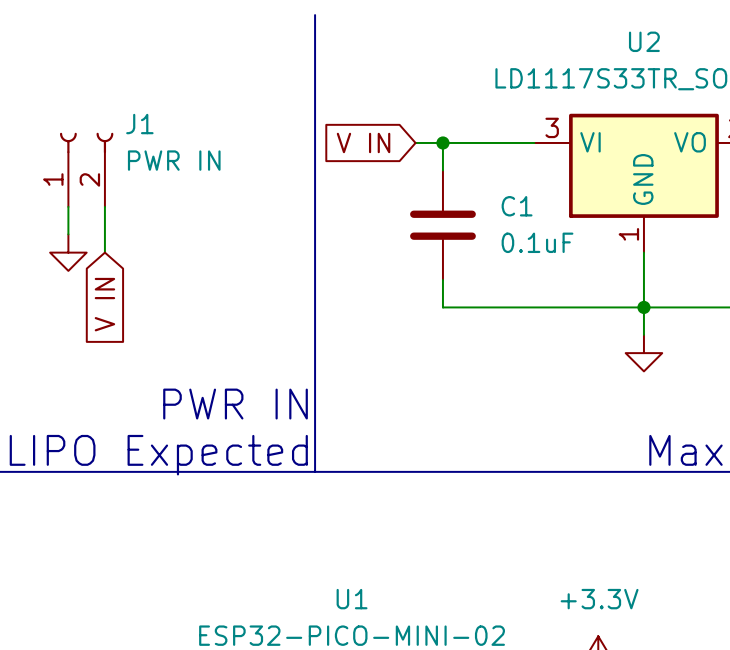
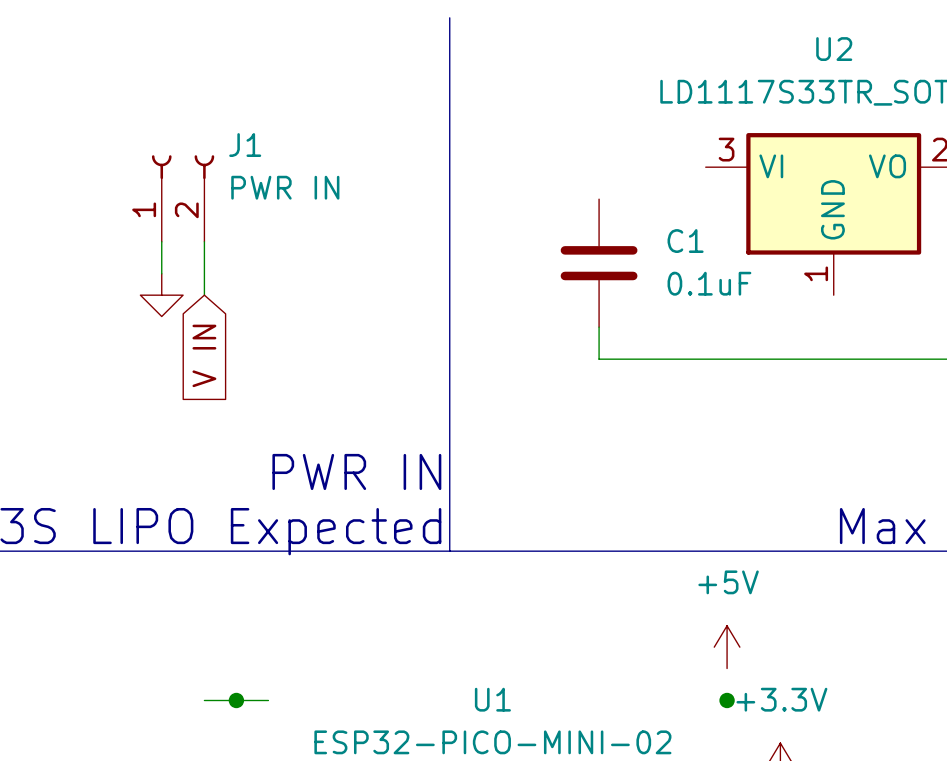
global label: V IN (363, 142) -> none
wire: (415, 142) (534, 142) -> none
wire: (442, 142) (442, 170) -> none
junction: (442, 142) -> none
wire: (643, 252) (643, 334) -> none
junction: (643, 307) -> none
power symbol: (643, 353) -> none
power symbol: none -> +5V (727, 647)
wire: none -> (204, 700) (268, 700)
junction: none -> (236, 700)
junction: none -> (727, 700)

